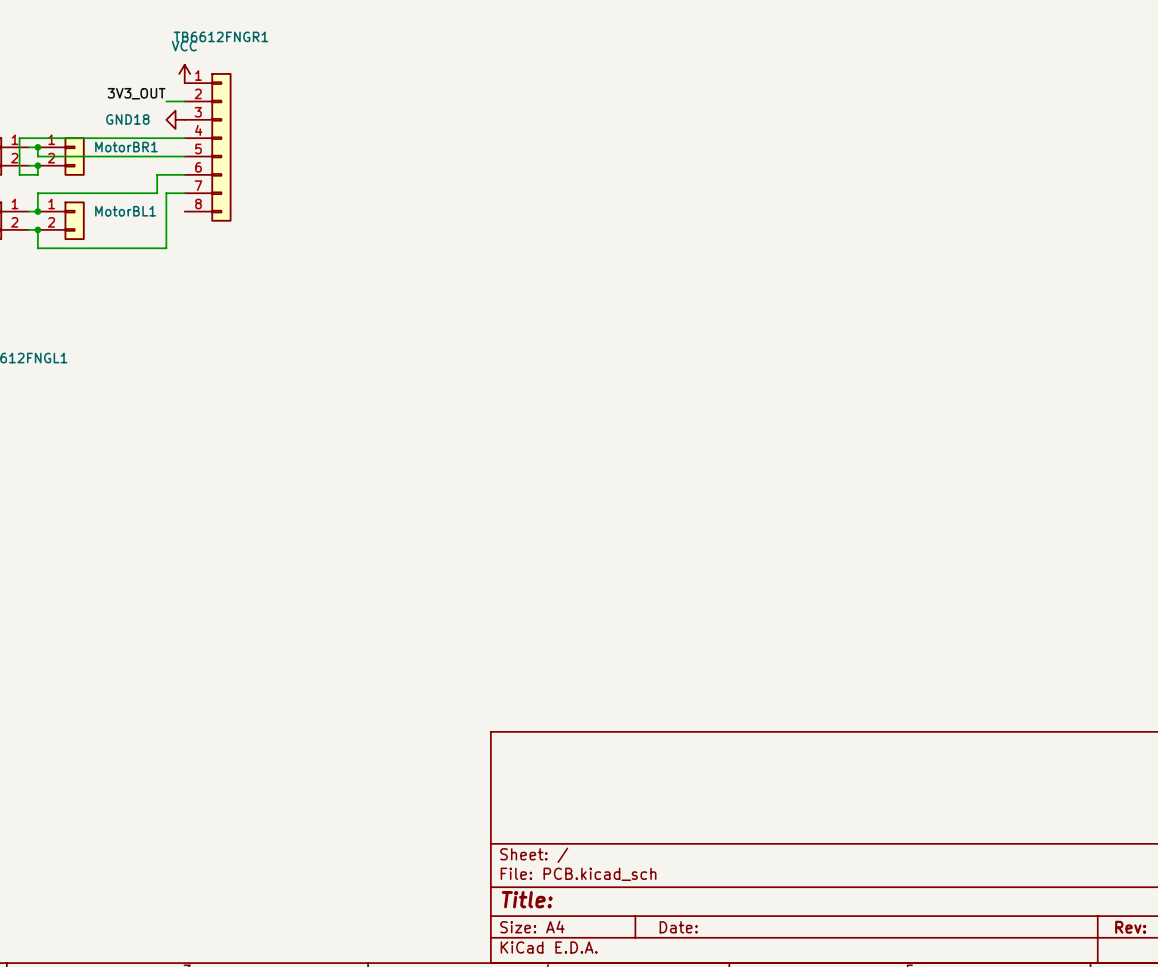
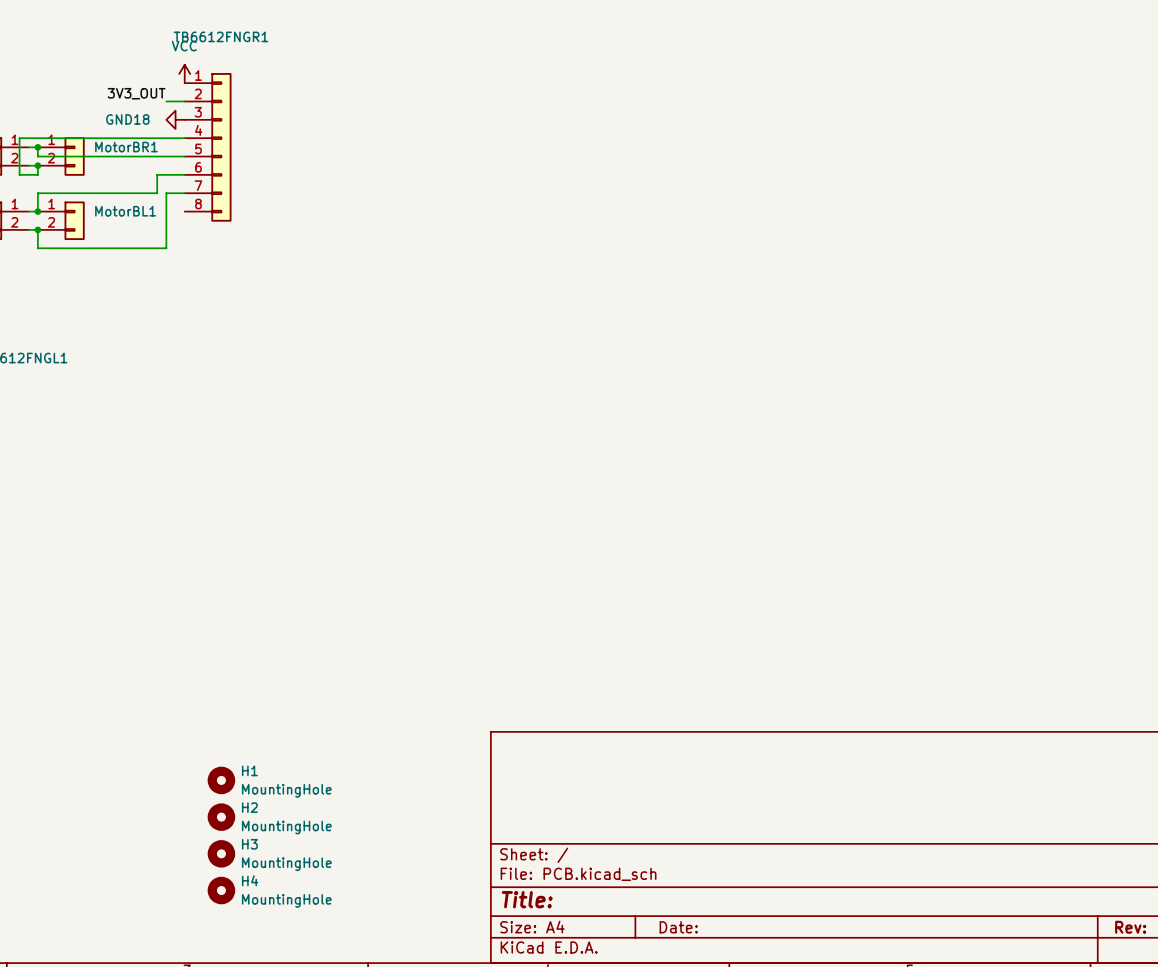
H1: none -> MountingHole (221, 780)
H2: none -> MountingHole (221, 817)
H3: none -> MountingHole (221, 853)
H4: none -> MountingHole (221, 890)

